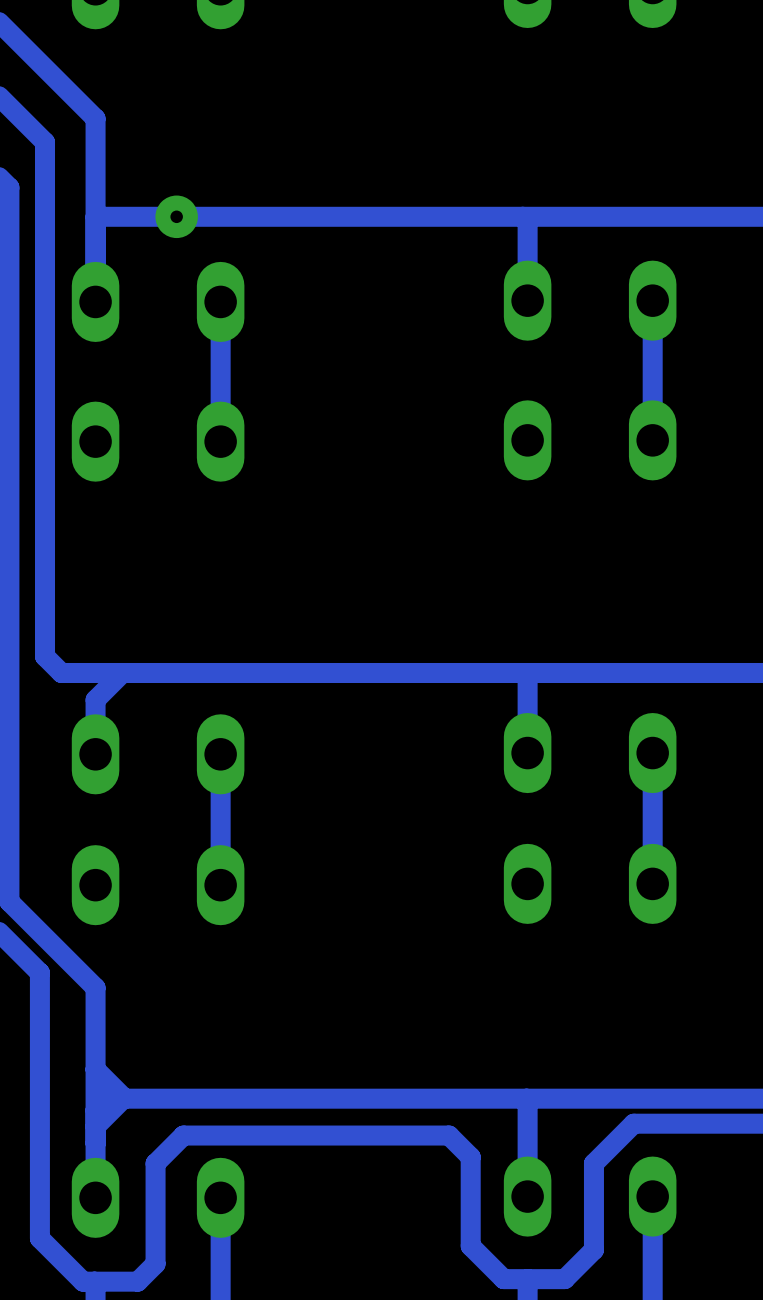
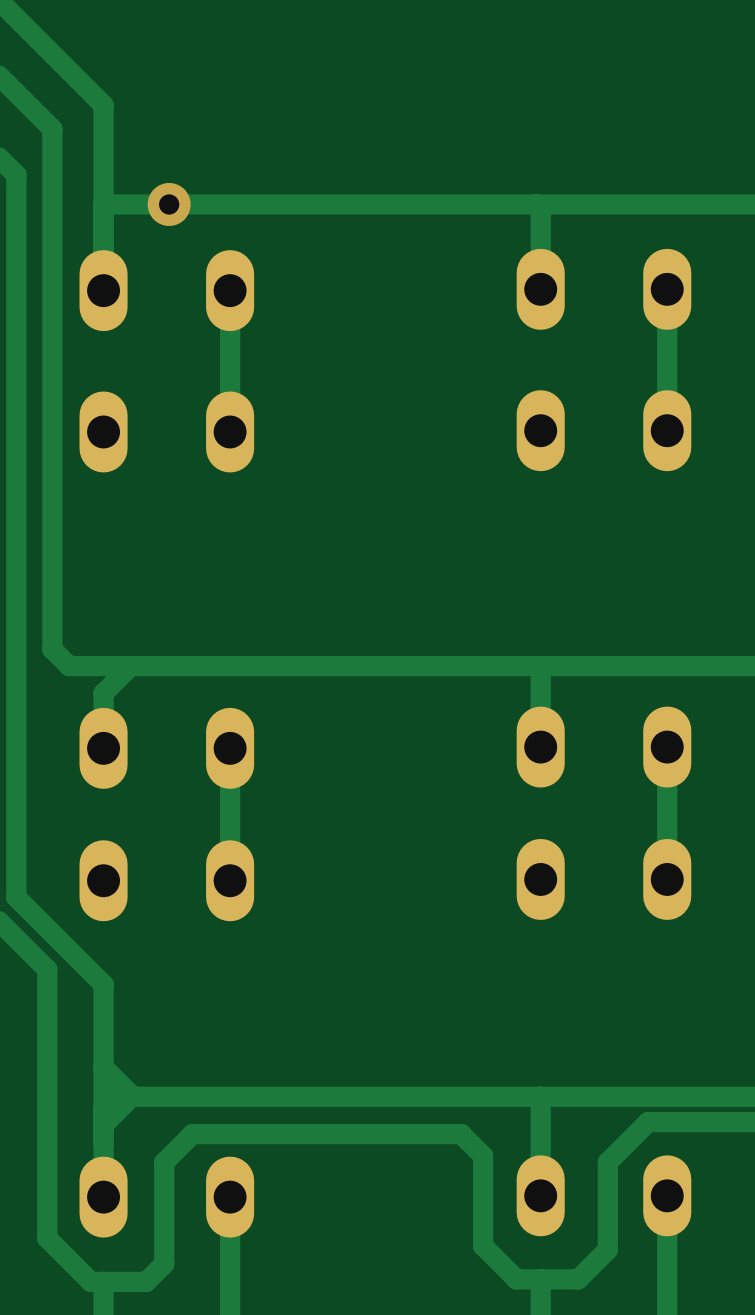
via position: (176, 216) -> (169, 204)

